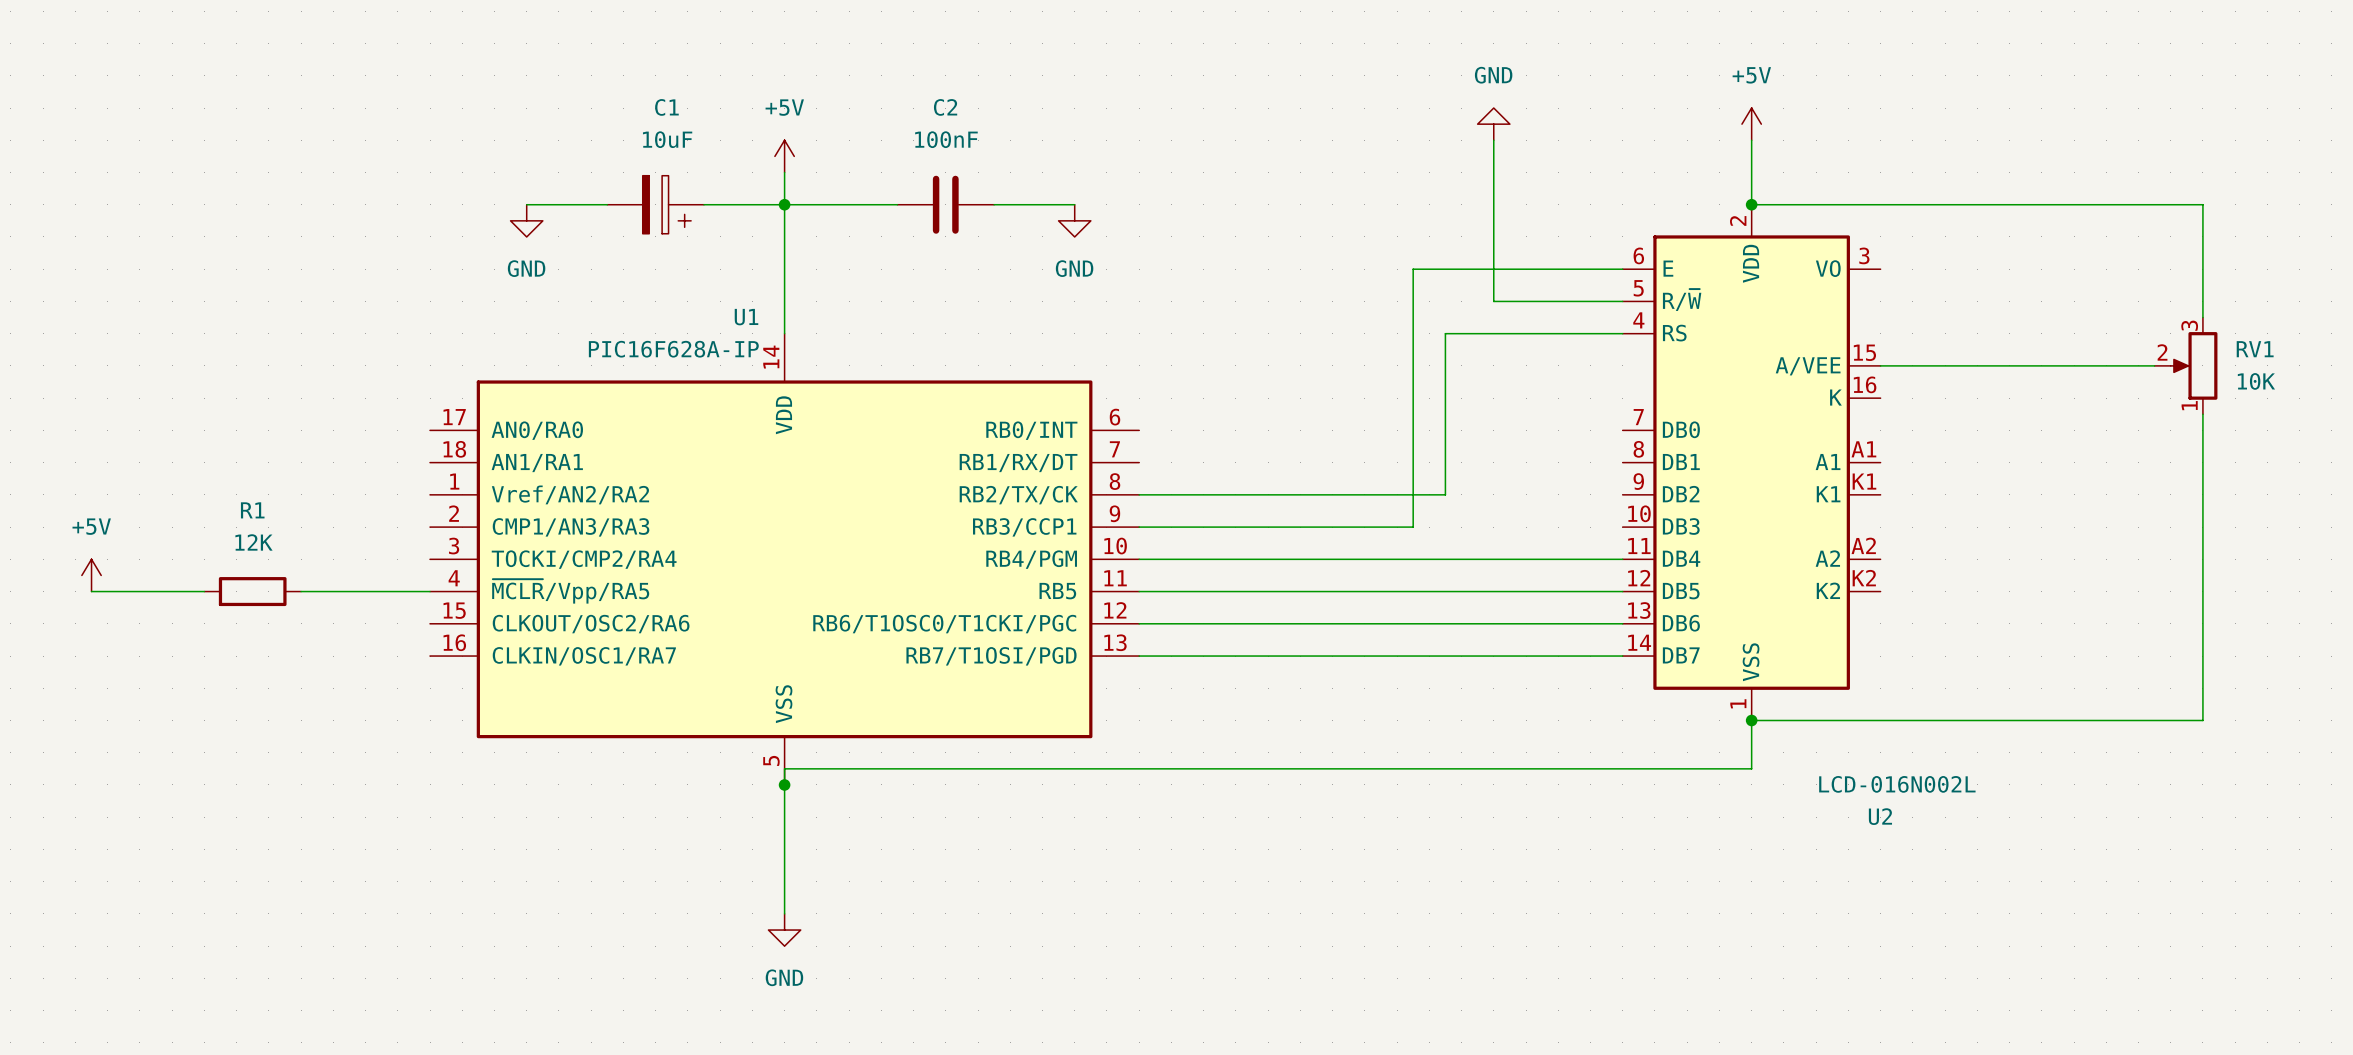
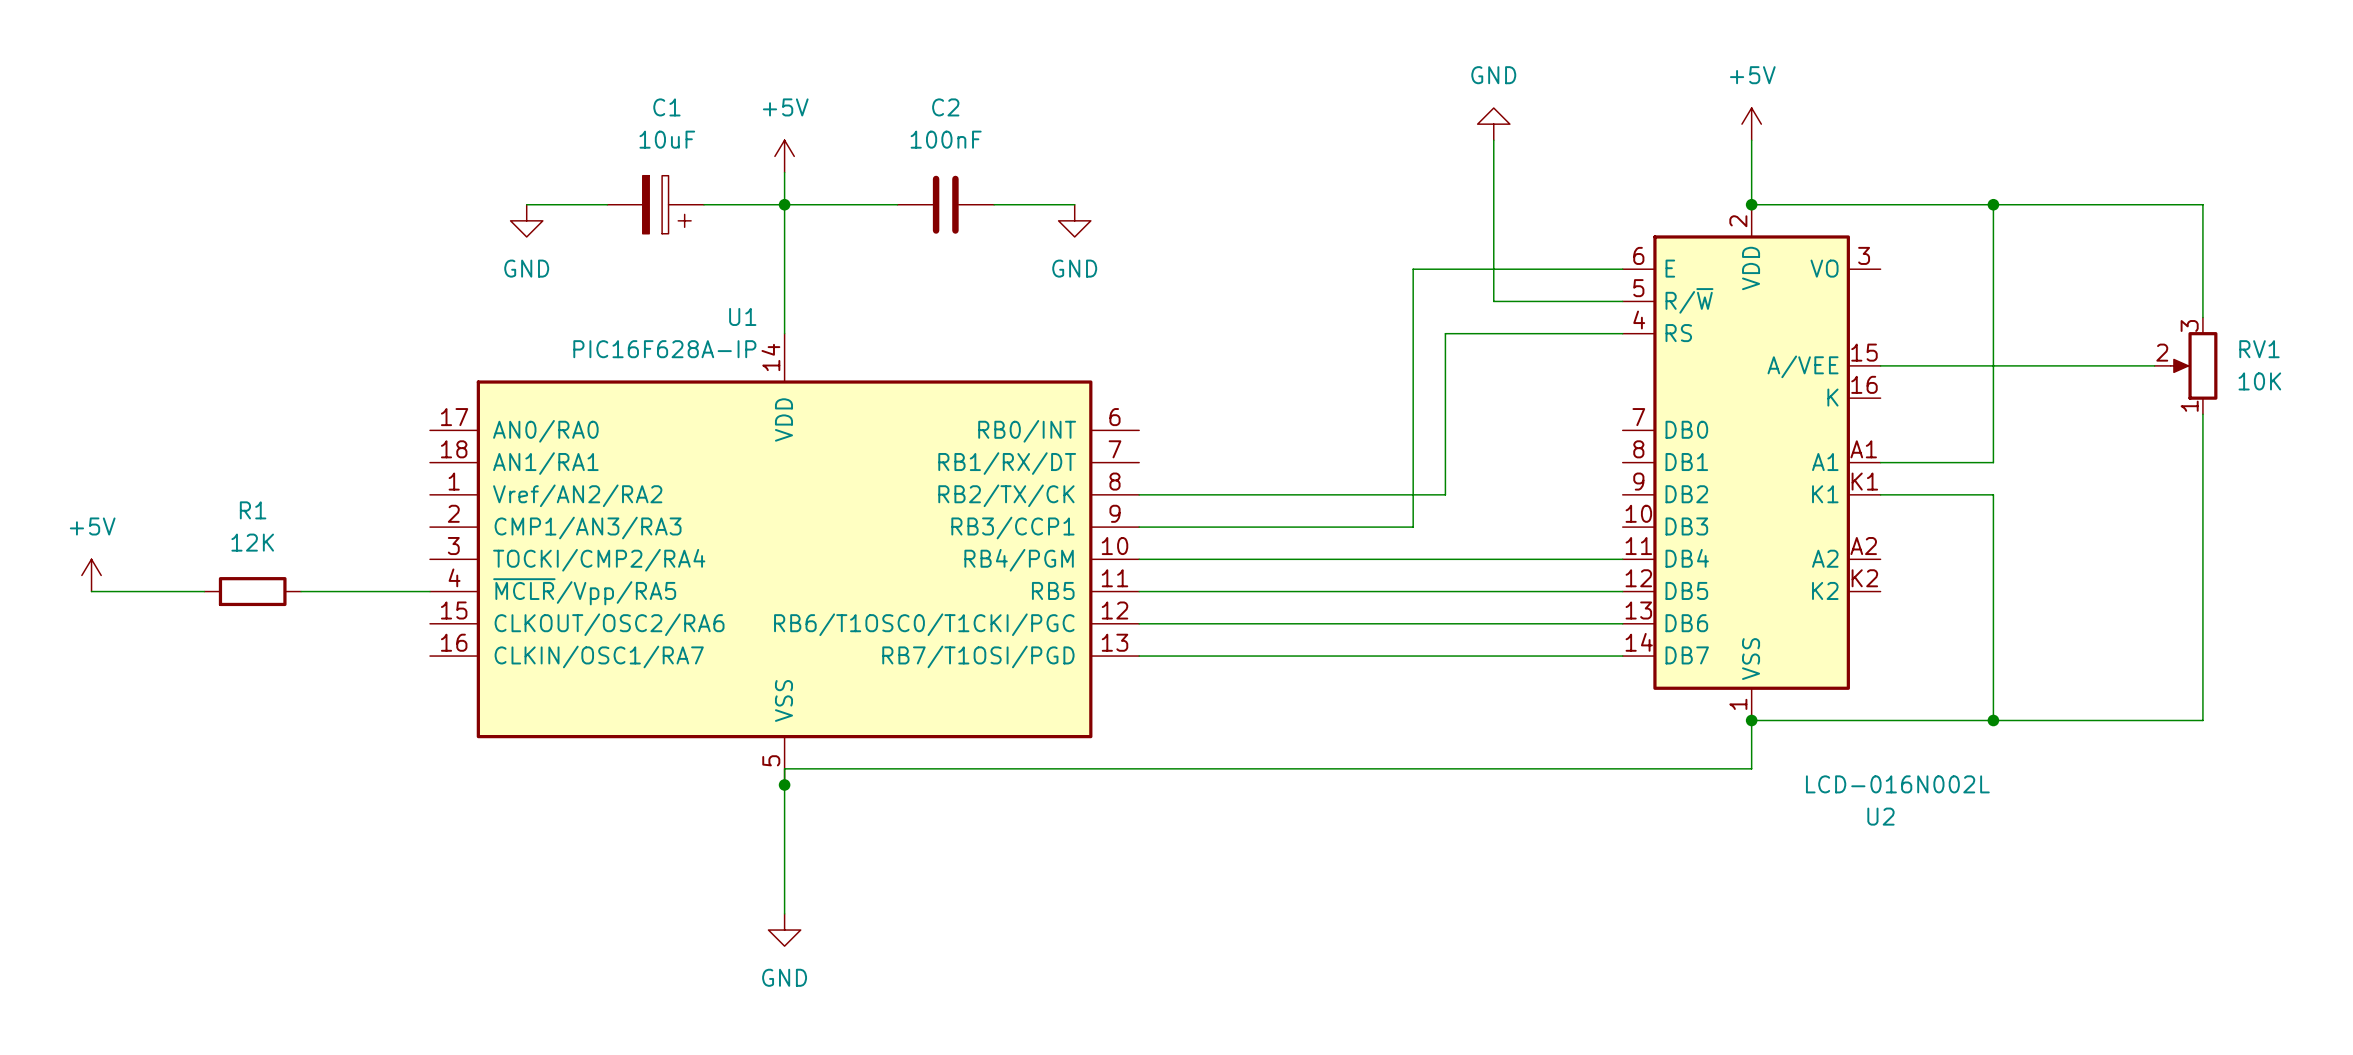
wire: none -> (1993, 204) (1993, 462) (1880, 462)
junction: none -> (1993, 204)
wire: none -> (1880, 494) (1993, 494) (1993, 720)
junction: none -> (1993, 720)

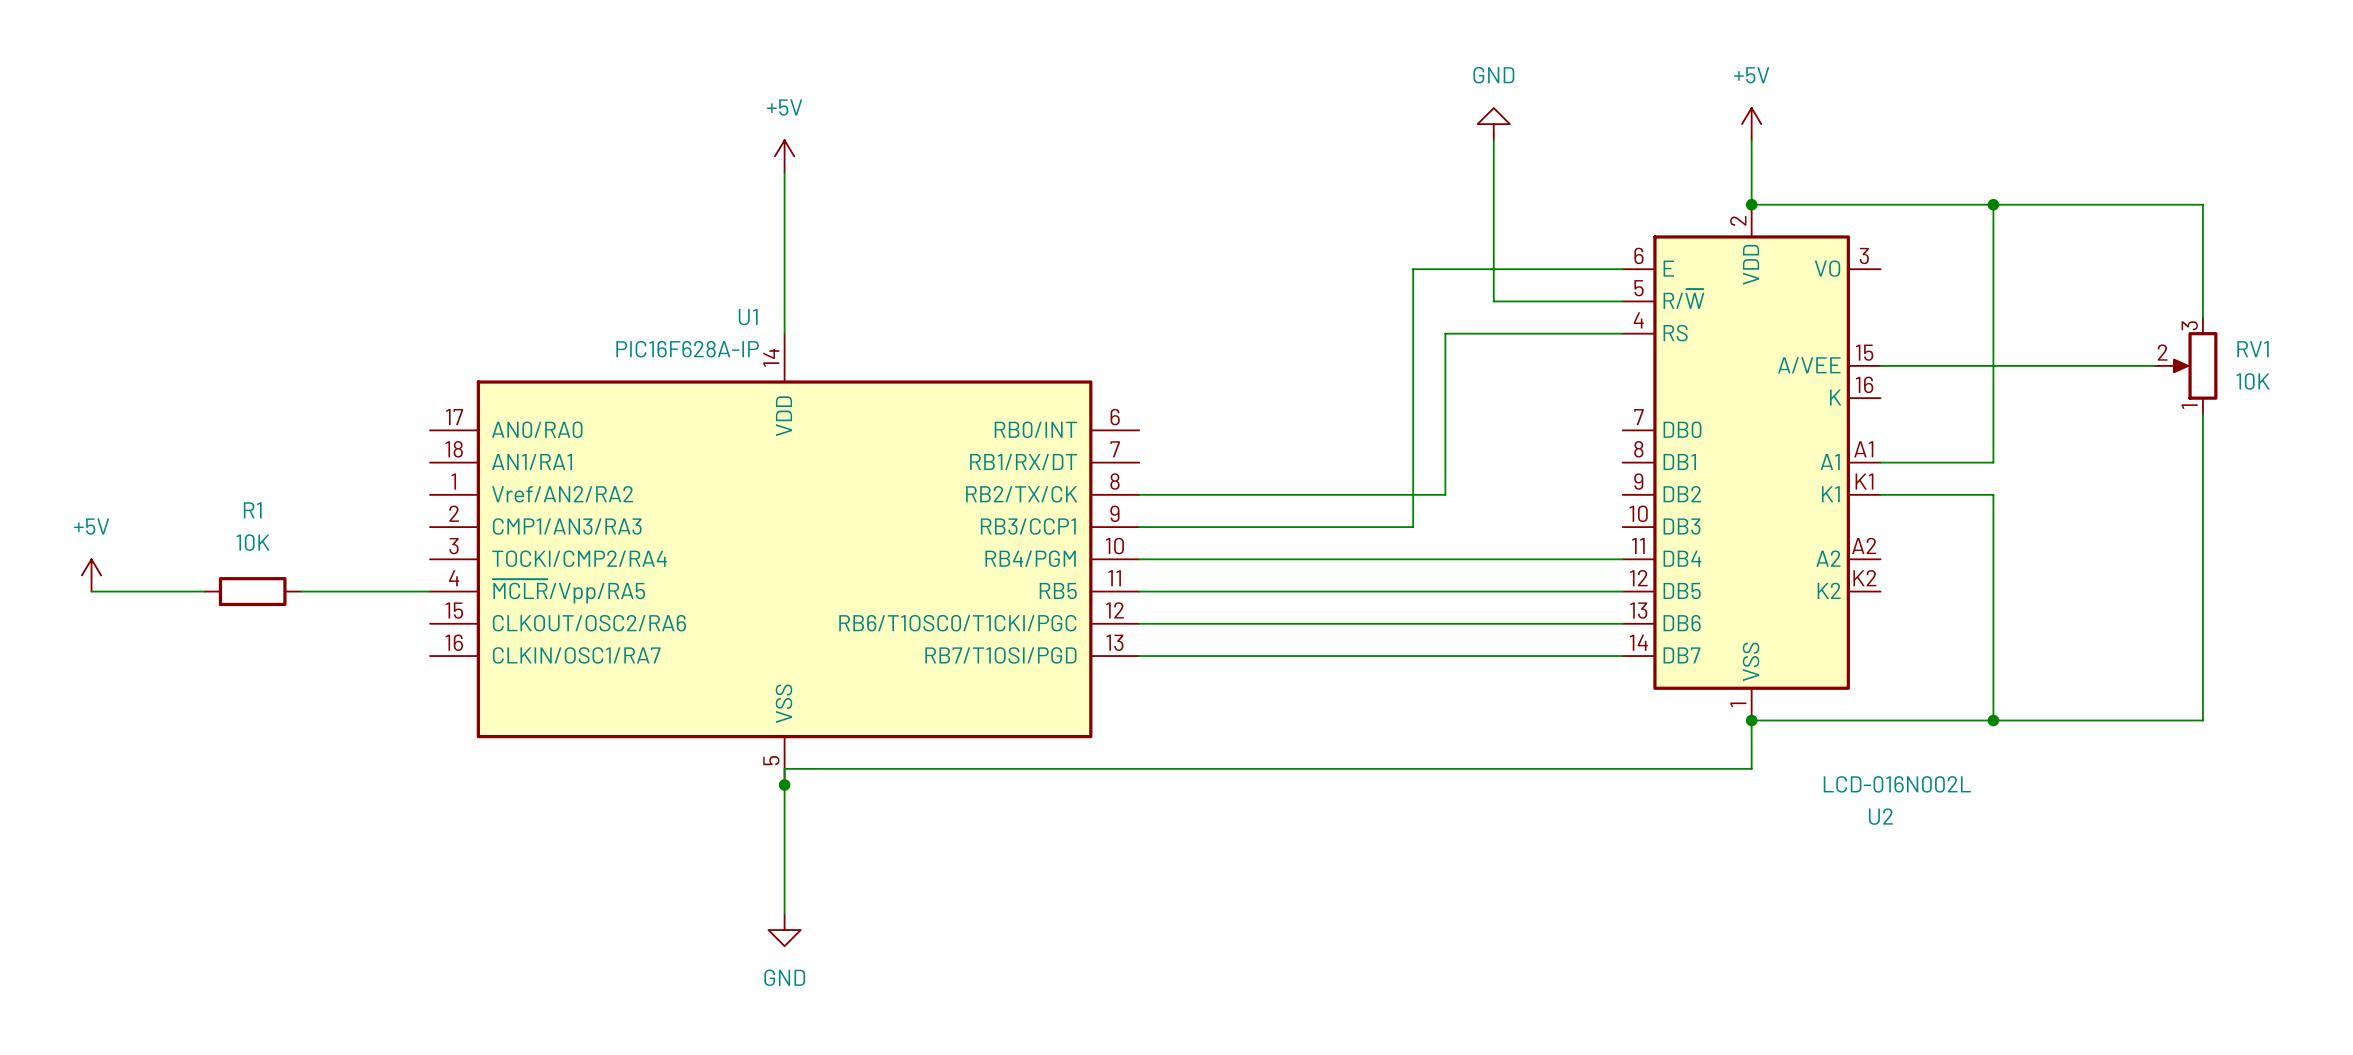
wire: (526, 204) (607, 204) -> none
C1: 10uF (655, 204) -> none
wire: (704, 204) (897, 204) -> none
junction: (784, 204) -> none
C2: 100nF (945, 204) -> none
wire: (994, 204) (1074, 204) -> none
power symbol: GND (526, 220) -> none
power symbol: GND (1074, 220) -> none
R1 value: 12K (252, 542) -> 10K (253, 542)

